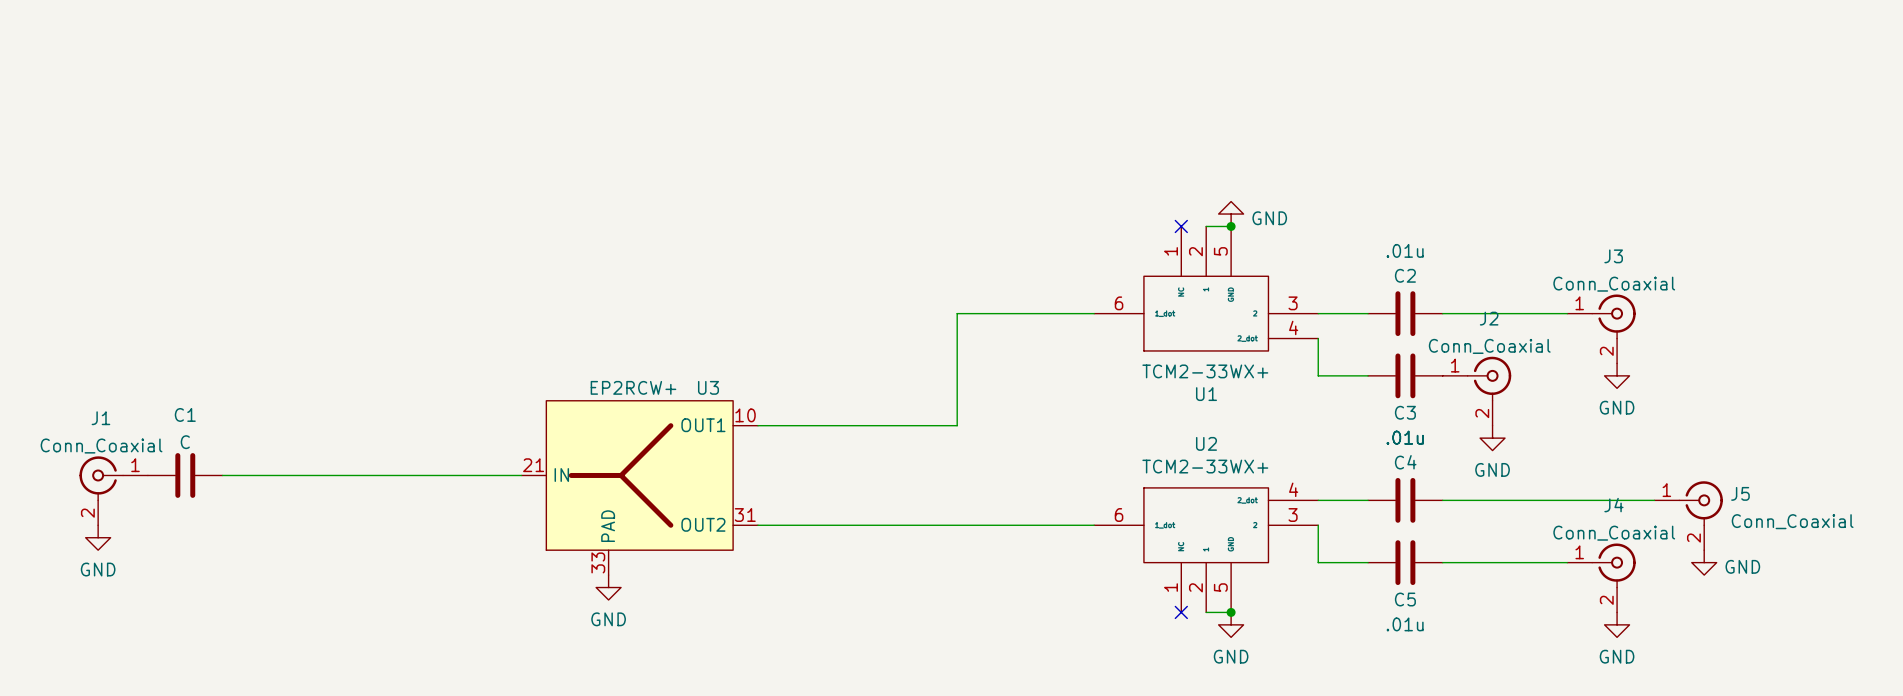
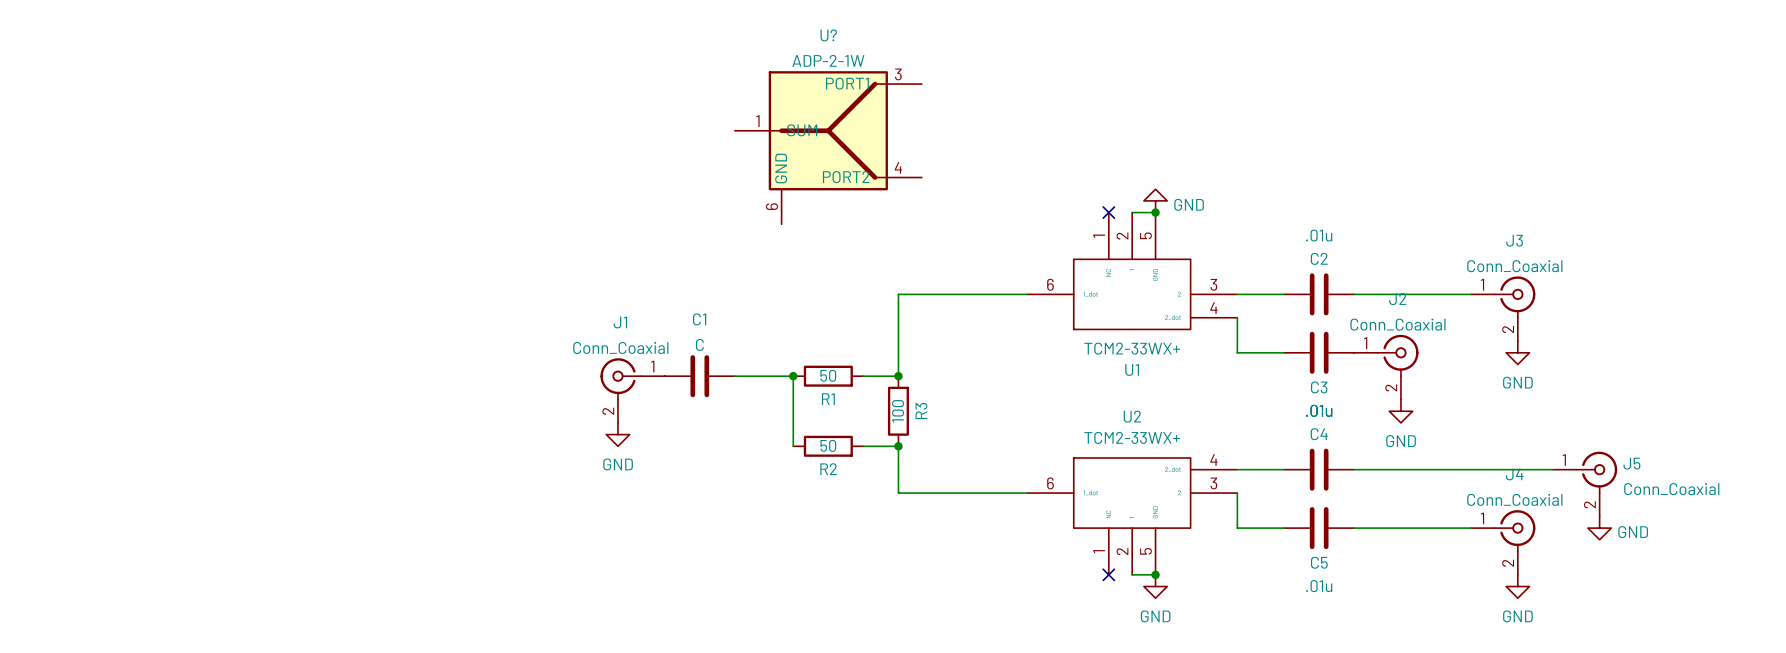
U?: none -> ADP-2-1W (828, 147)
wire: none -> (734, 376) (793, 376) (793, 446)
junction: none -> (793, 376)
R1: none -> 50 (828, 376)
wire: (957, 400) (957, 425) (757, 425) -> (898, 376) (863, 376)
junction: none -> (898, 376)
R3: none -> 100 (898, 411)
C1 position: (185, 475) -> (699, 376)
wire: (222, 475) (521, 475) -> none
R2: none -> 50 (828, 446)
junction: none -> (898, 446)
U3: EP2RCW+ (639, 487) -> none
J1 position: (113, 490) -> (632, 390)
wire: (757, 525) (957, 525) -> (863, 446) (898, 446) (898, 493)
power symbol: GND (98, 537) -> none
power symbol position: GND (608, 587) -> GND (617, 434)

